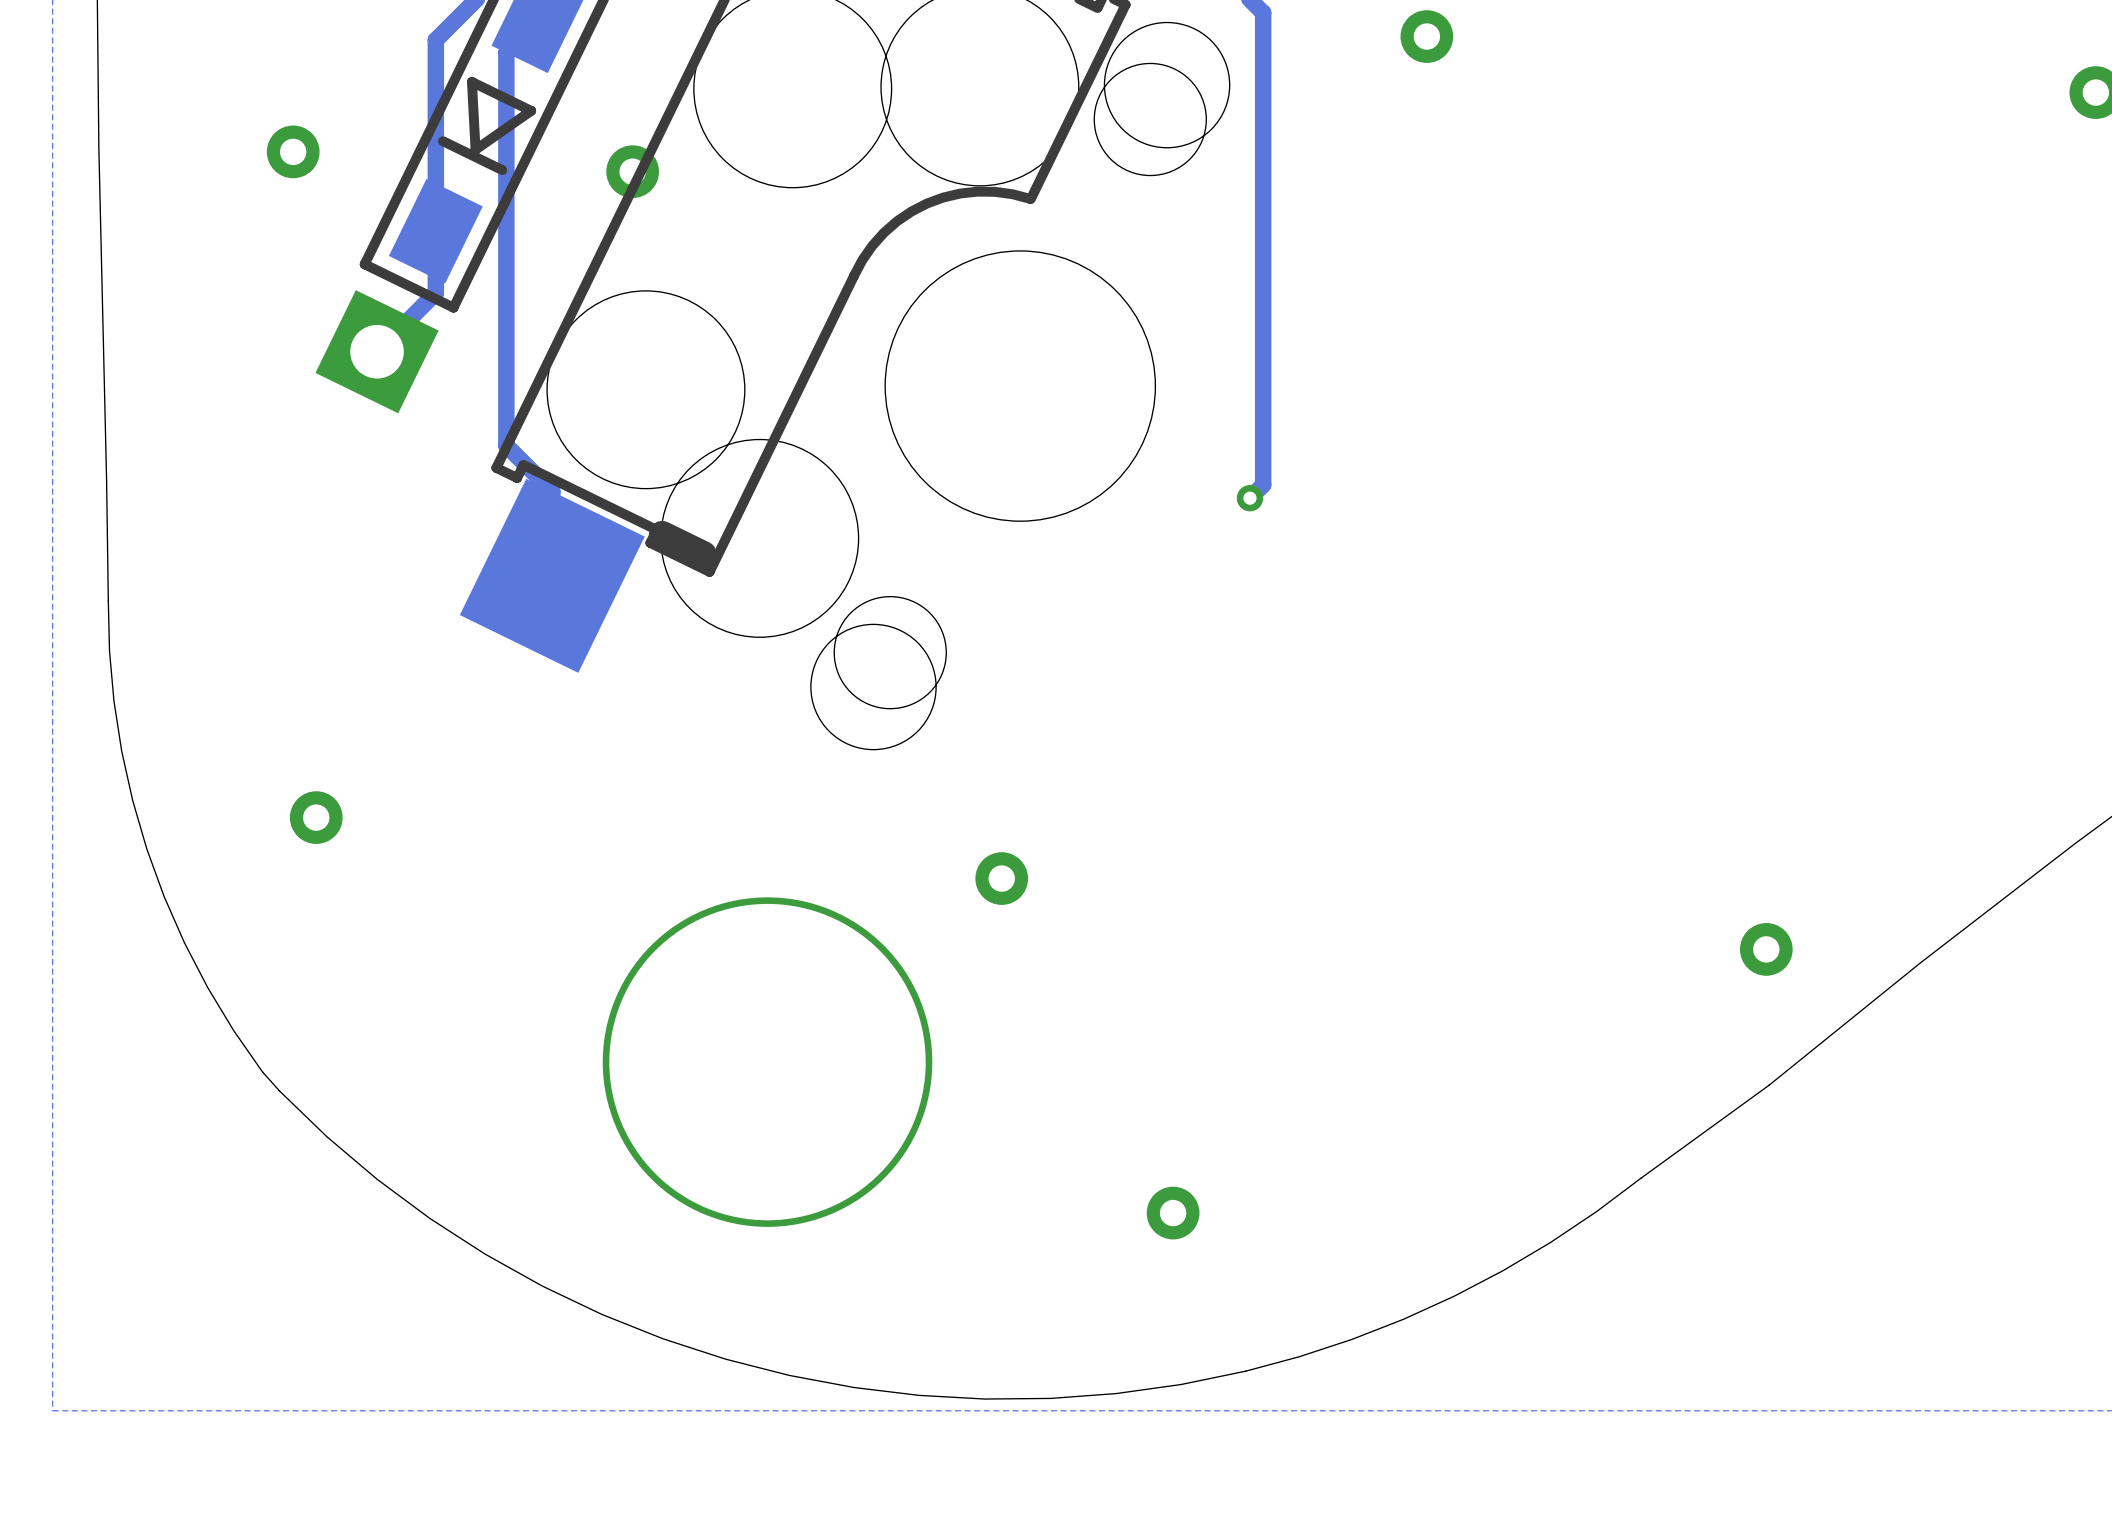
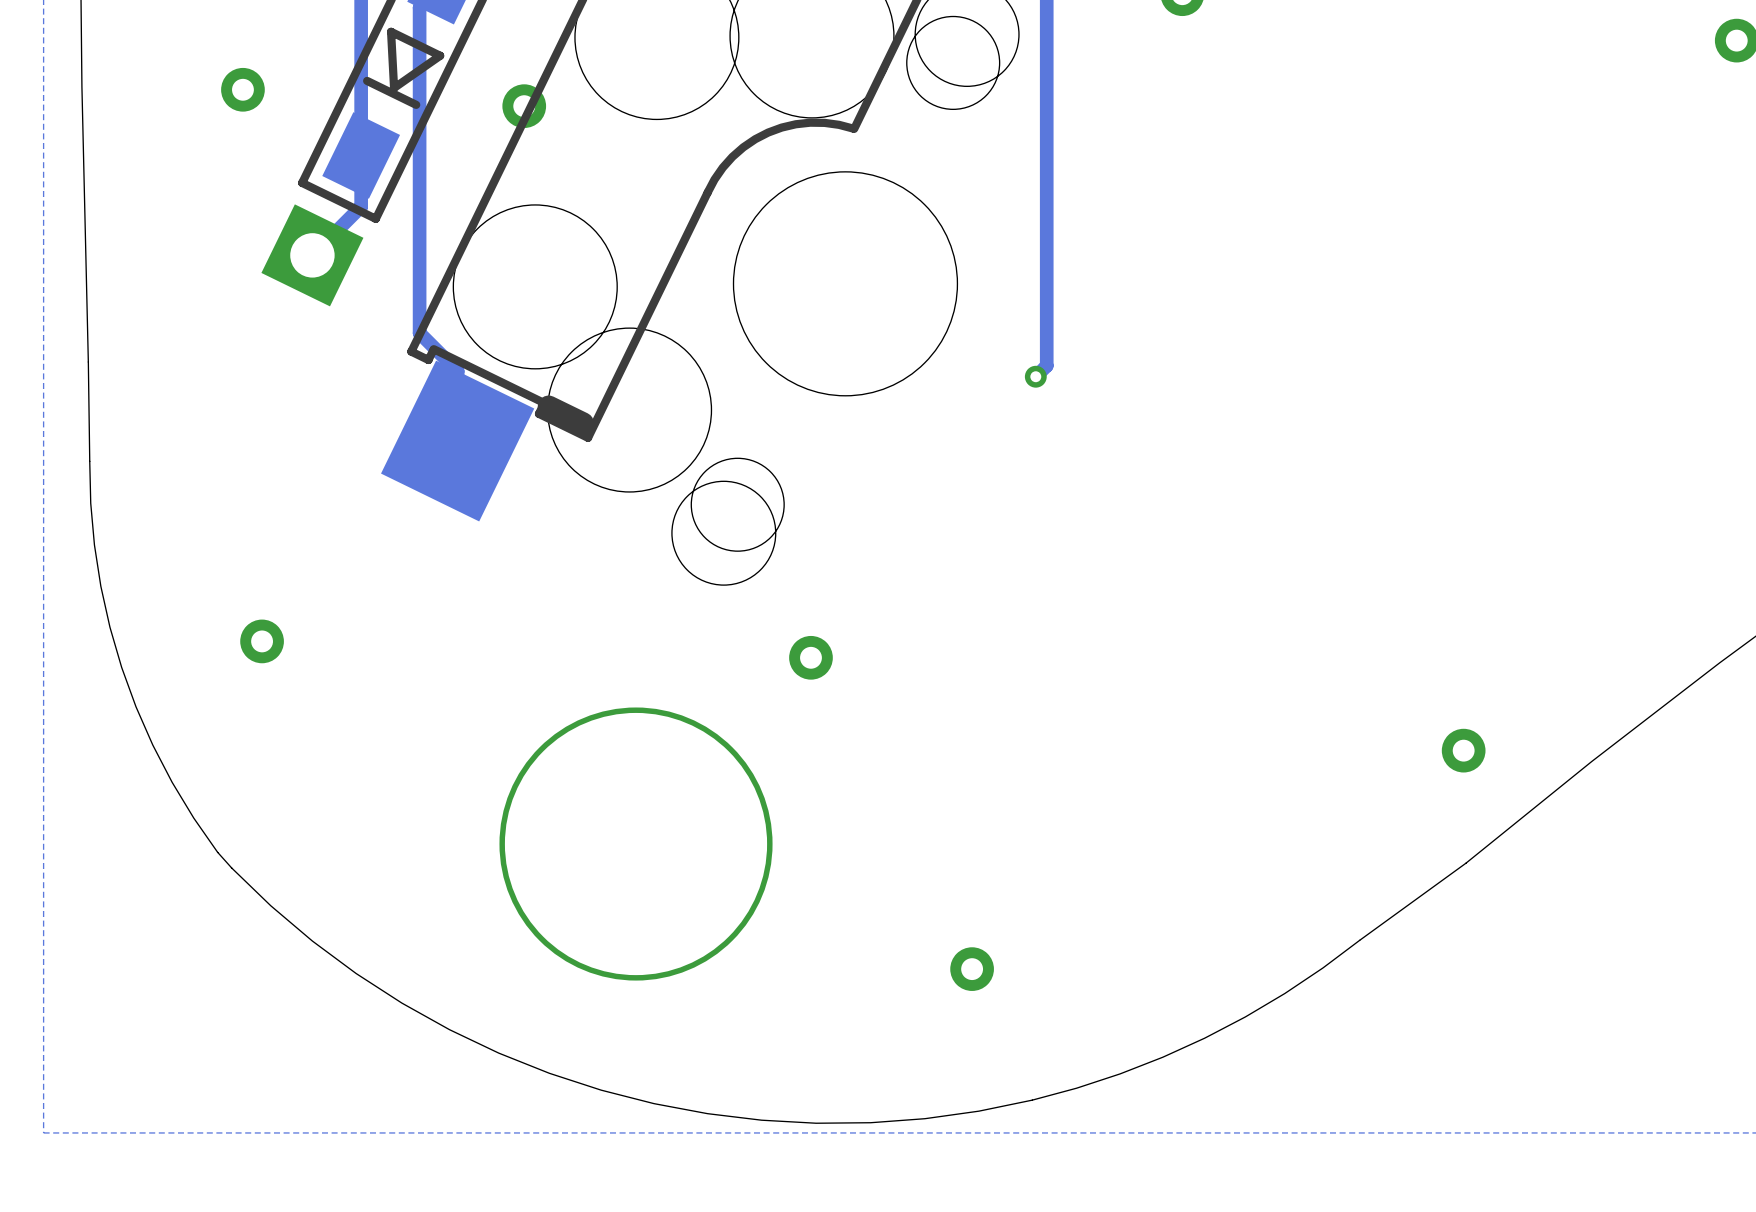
via position: (1001, 878) -> (810, 657)

